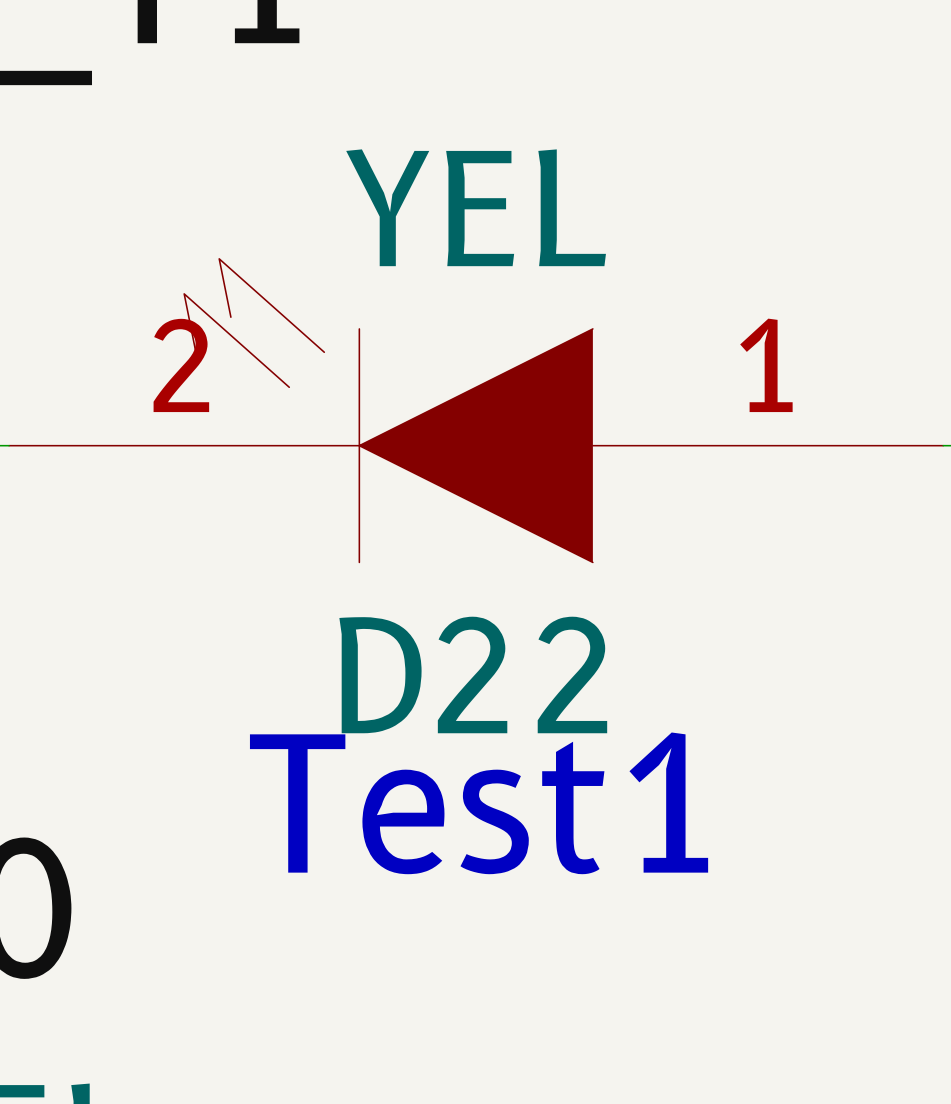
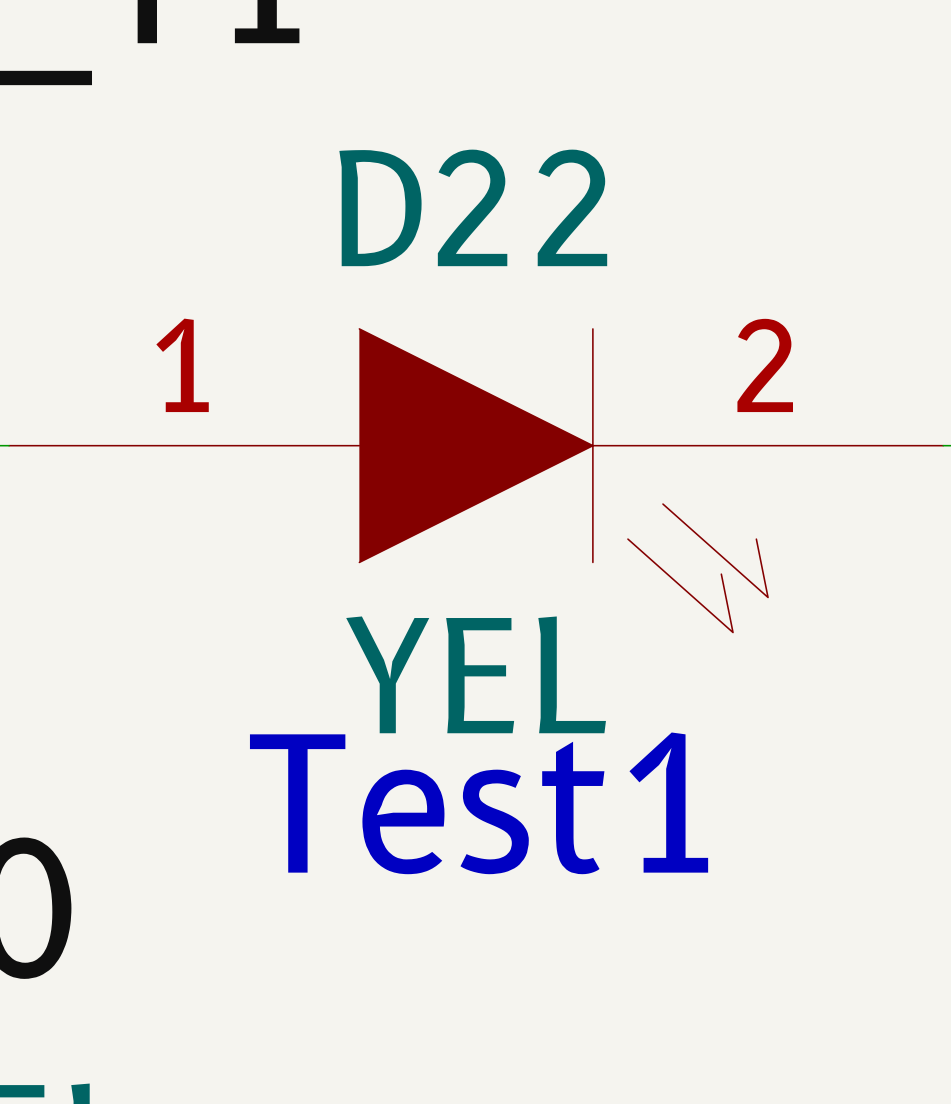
D22 rotation: 0° (388, 410) -> 180° (563, 480)

